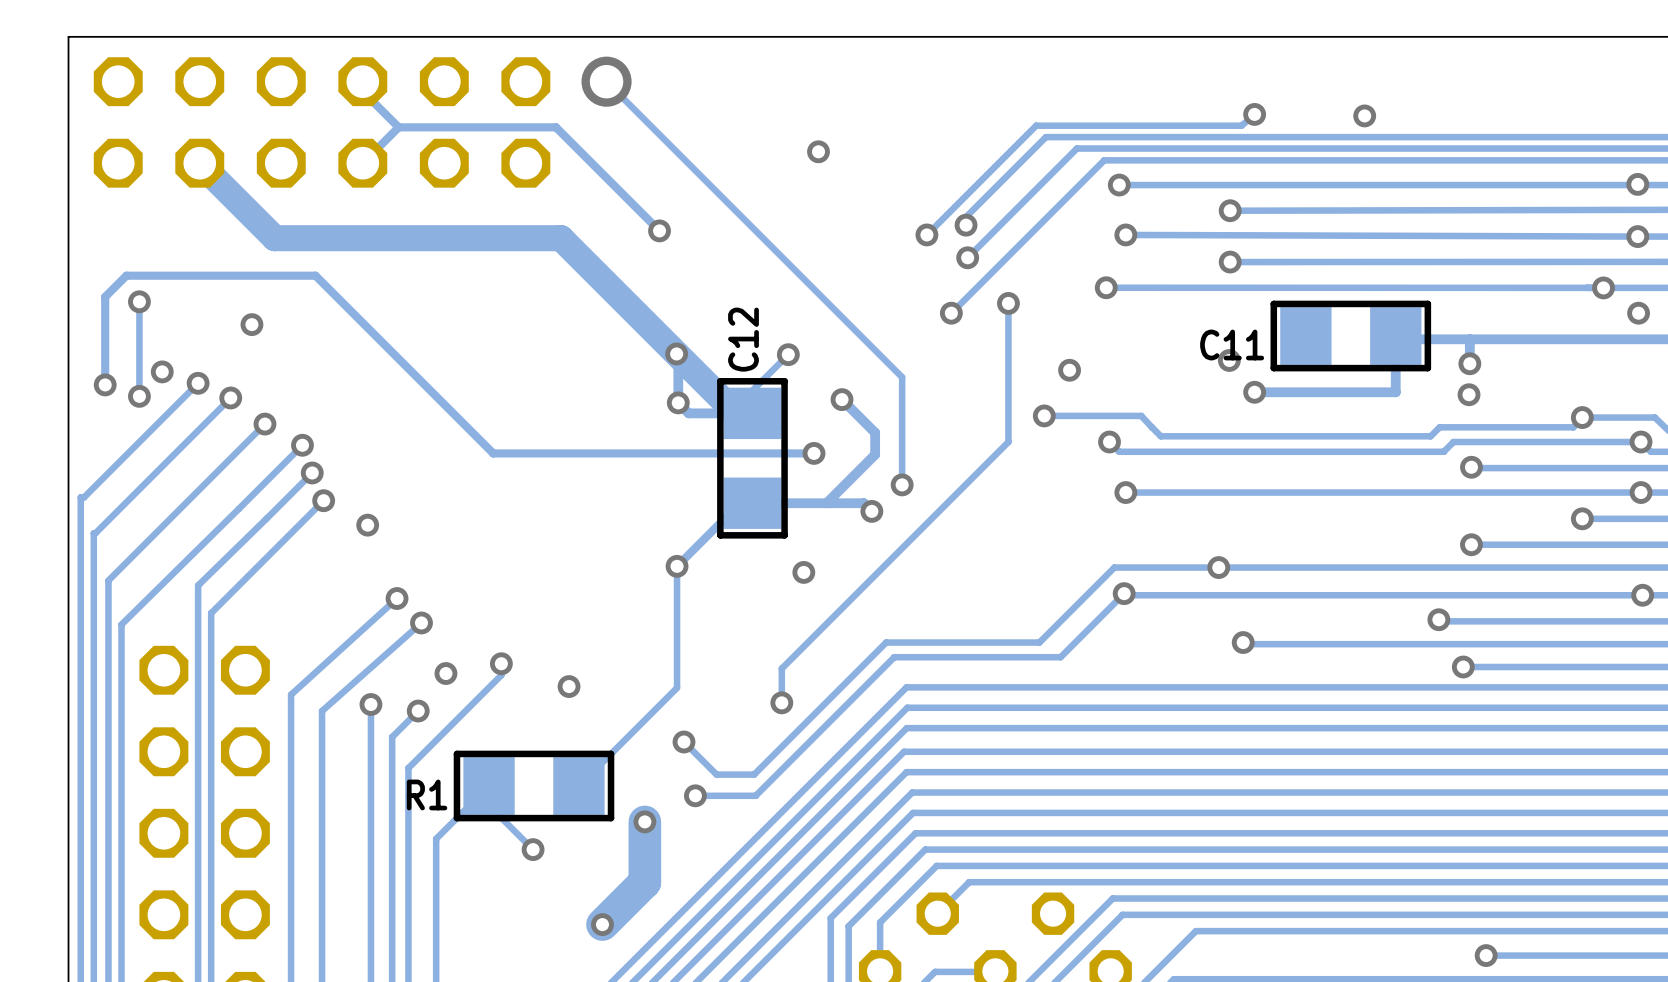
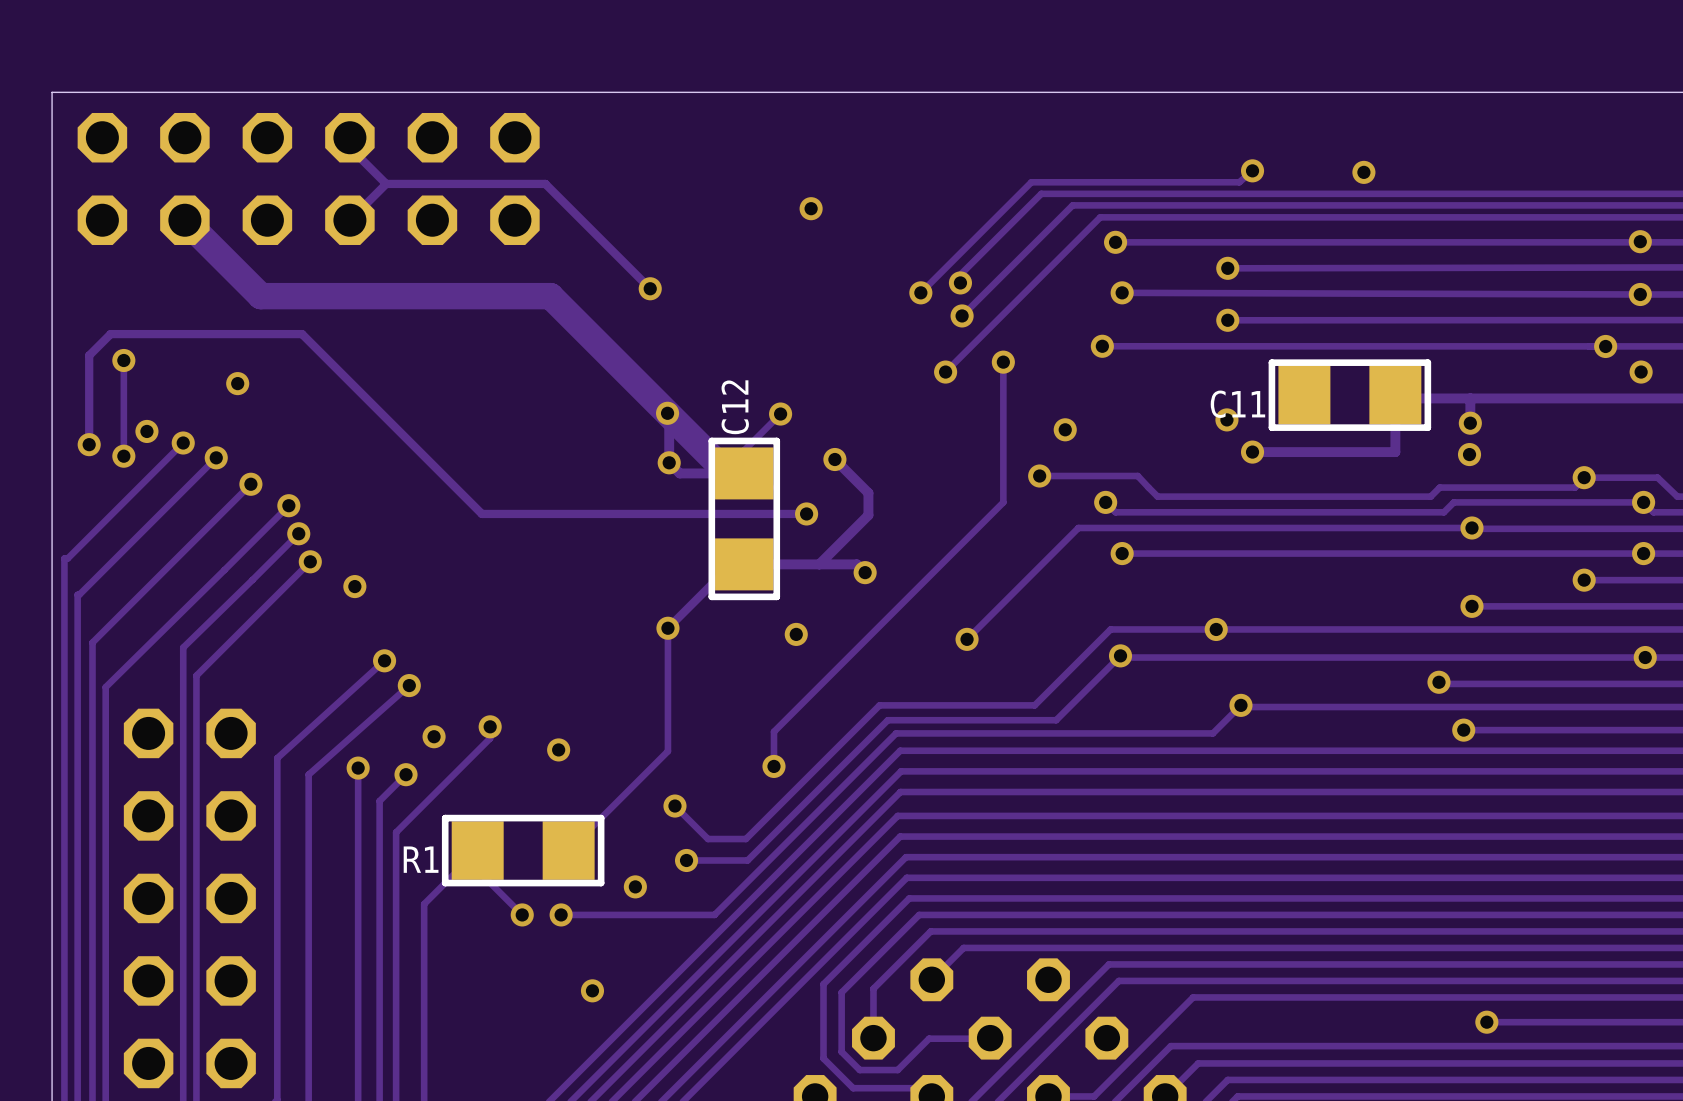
track: (606, 81) (902, 377) (902, 484) -> none
via: (606, 81) -> none
track: none -> (1471, 527) (1078, 527) (967, 639)
via position: (902, 484) -> (967, 639)
track: none -> (1240, 705) (1212, 733) (896, 733) (714, 914) (561, 914)
track: (644, 821) (644, 882) (602, 924) -> none
via: none -> (561, 914)

